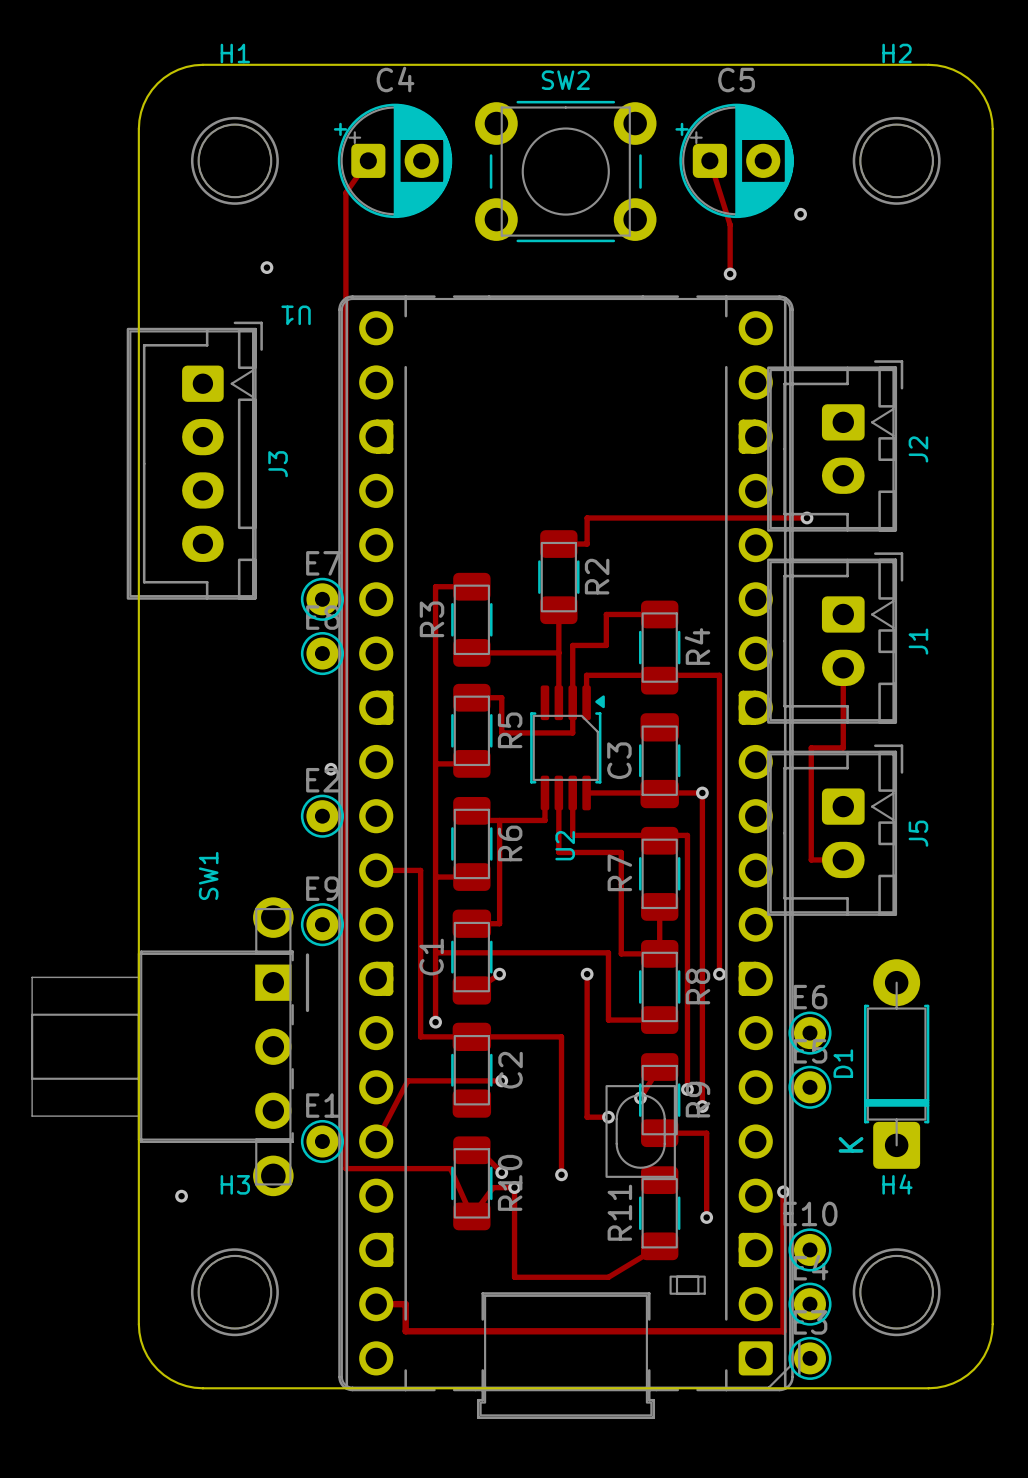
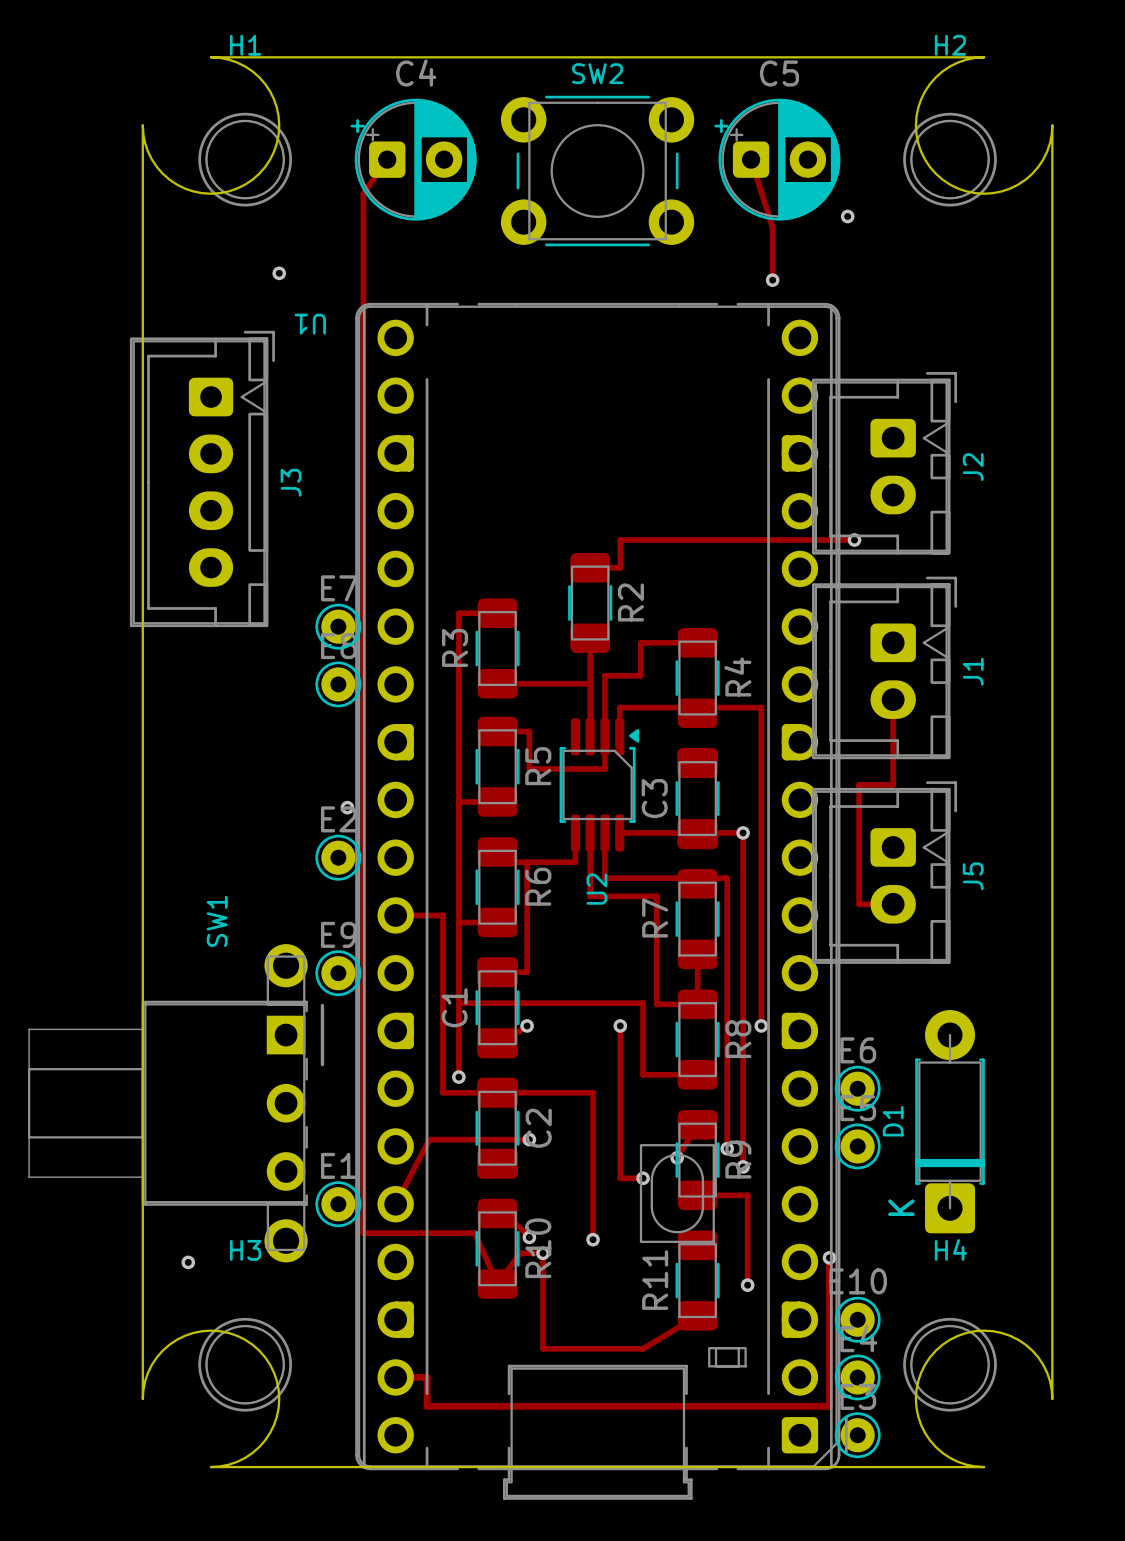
board edge: (202, 64) (178, 69) (157, 83) (143, 104) (138, 128) -> (211, 57) (228, 59) (245, 66) (259, 77) (274, 99) (278, 116) (278, 134) (270, 159) (259, 173) (245, 184) (219, 193) (202, 193) (184, 188) (162, 173) (151, 159) (145, 143) (142, 125)
board edge: (928, 64) (953, 69) (973, 83) (987, 104) (992, 128) -> (984, 57) (966, 59) (950, 66) (935, 77) (921, 99) (915, 125) (918, 143) (925, 159) (935, 173) (950, 184) (975, 193) (993, 193) (1010, 188) (1025, 179) (1038, 167) (1050, 143) (1052, 125)
board edge: (138, 1324) (143, 1348) (157, 1369) (178, 1383) (202, 1388) -> (142, 1398) (145, 1381) (151, 1364) (169, 1344) (184, 1335) (202, 1331) (219, 1331) (245, 1339) (259, 1350) (270, 1364) (276, 1381) (278, 1407) (274, 1424) (265, 1440) (245, 1457) (228, 1464) (211, 1467)
board edge: (992, 1324) (987, 1348) (973, 1369) (953, 1383) (928, 1388) -> (1052, 1398) (1050, 1381) (1043, 1364) (1025, 1344) (1010, 1335) (993, 1331) (966, 1332) (950, 1339) (935, 1350) (925, 1364) (918, 1381) (916, 1407) (921, 1424) (935, 1447) (950, 1457) (966, 1464) (984, 1467)

